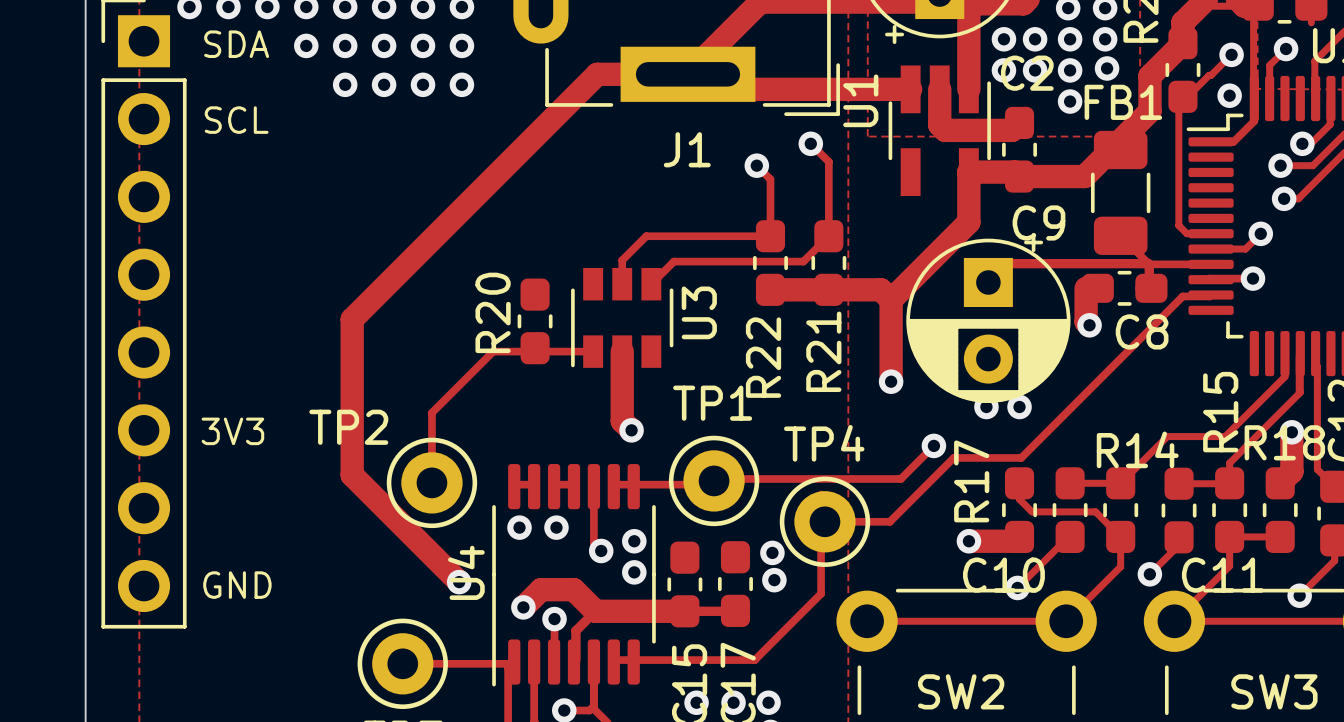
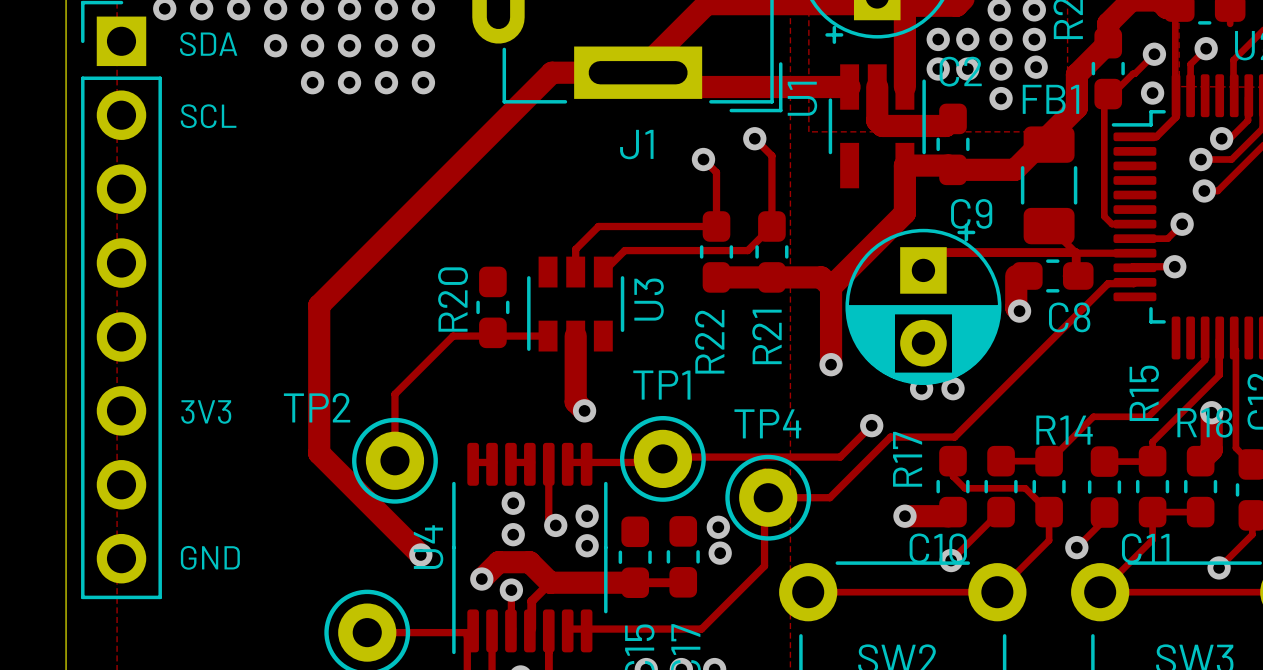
via position: (519, 527) -> (513, 534)

